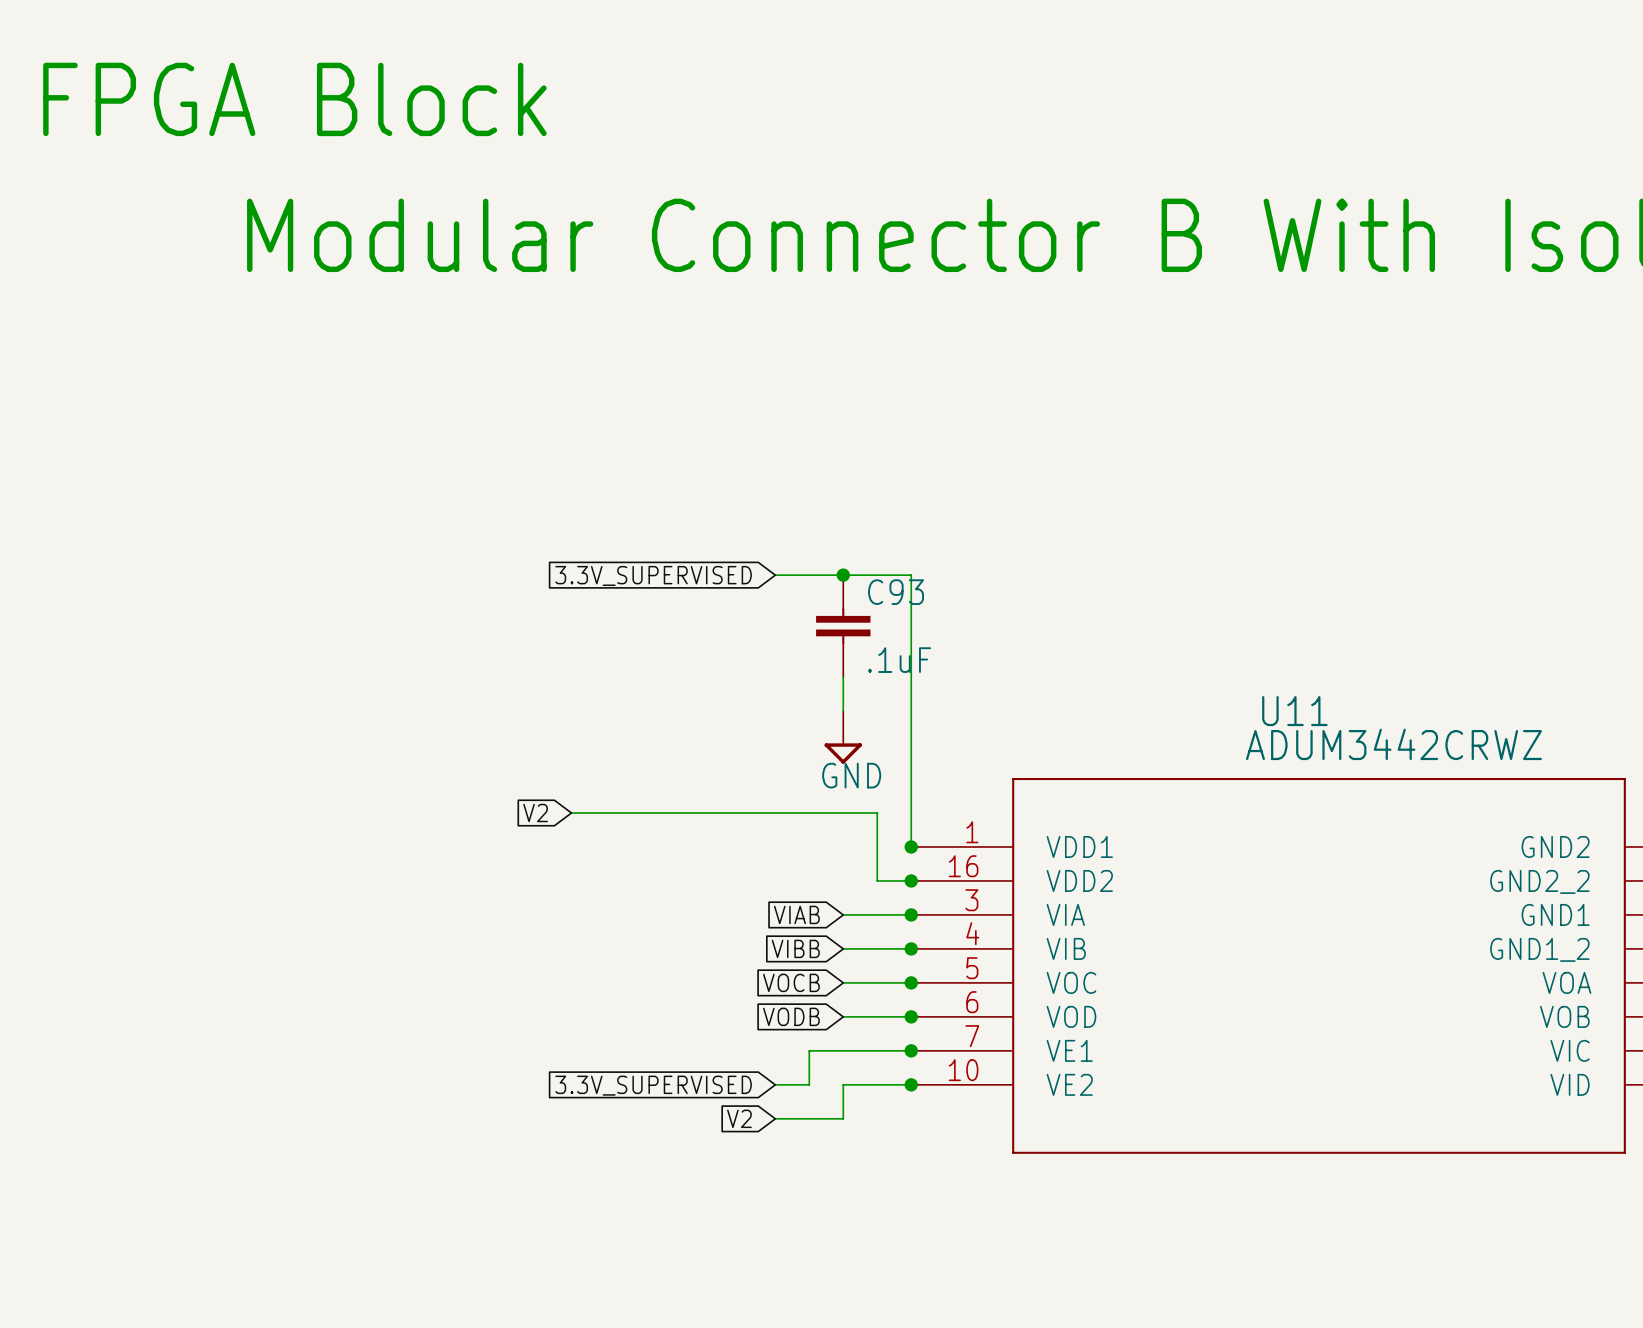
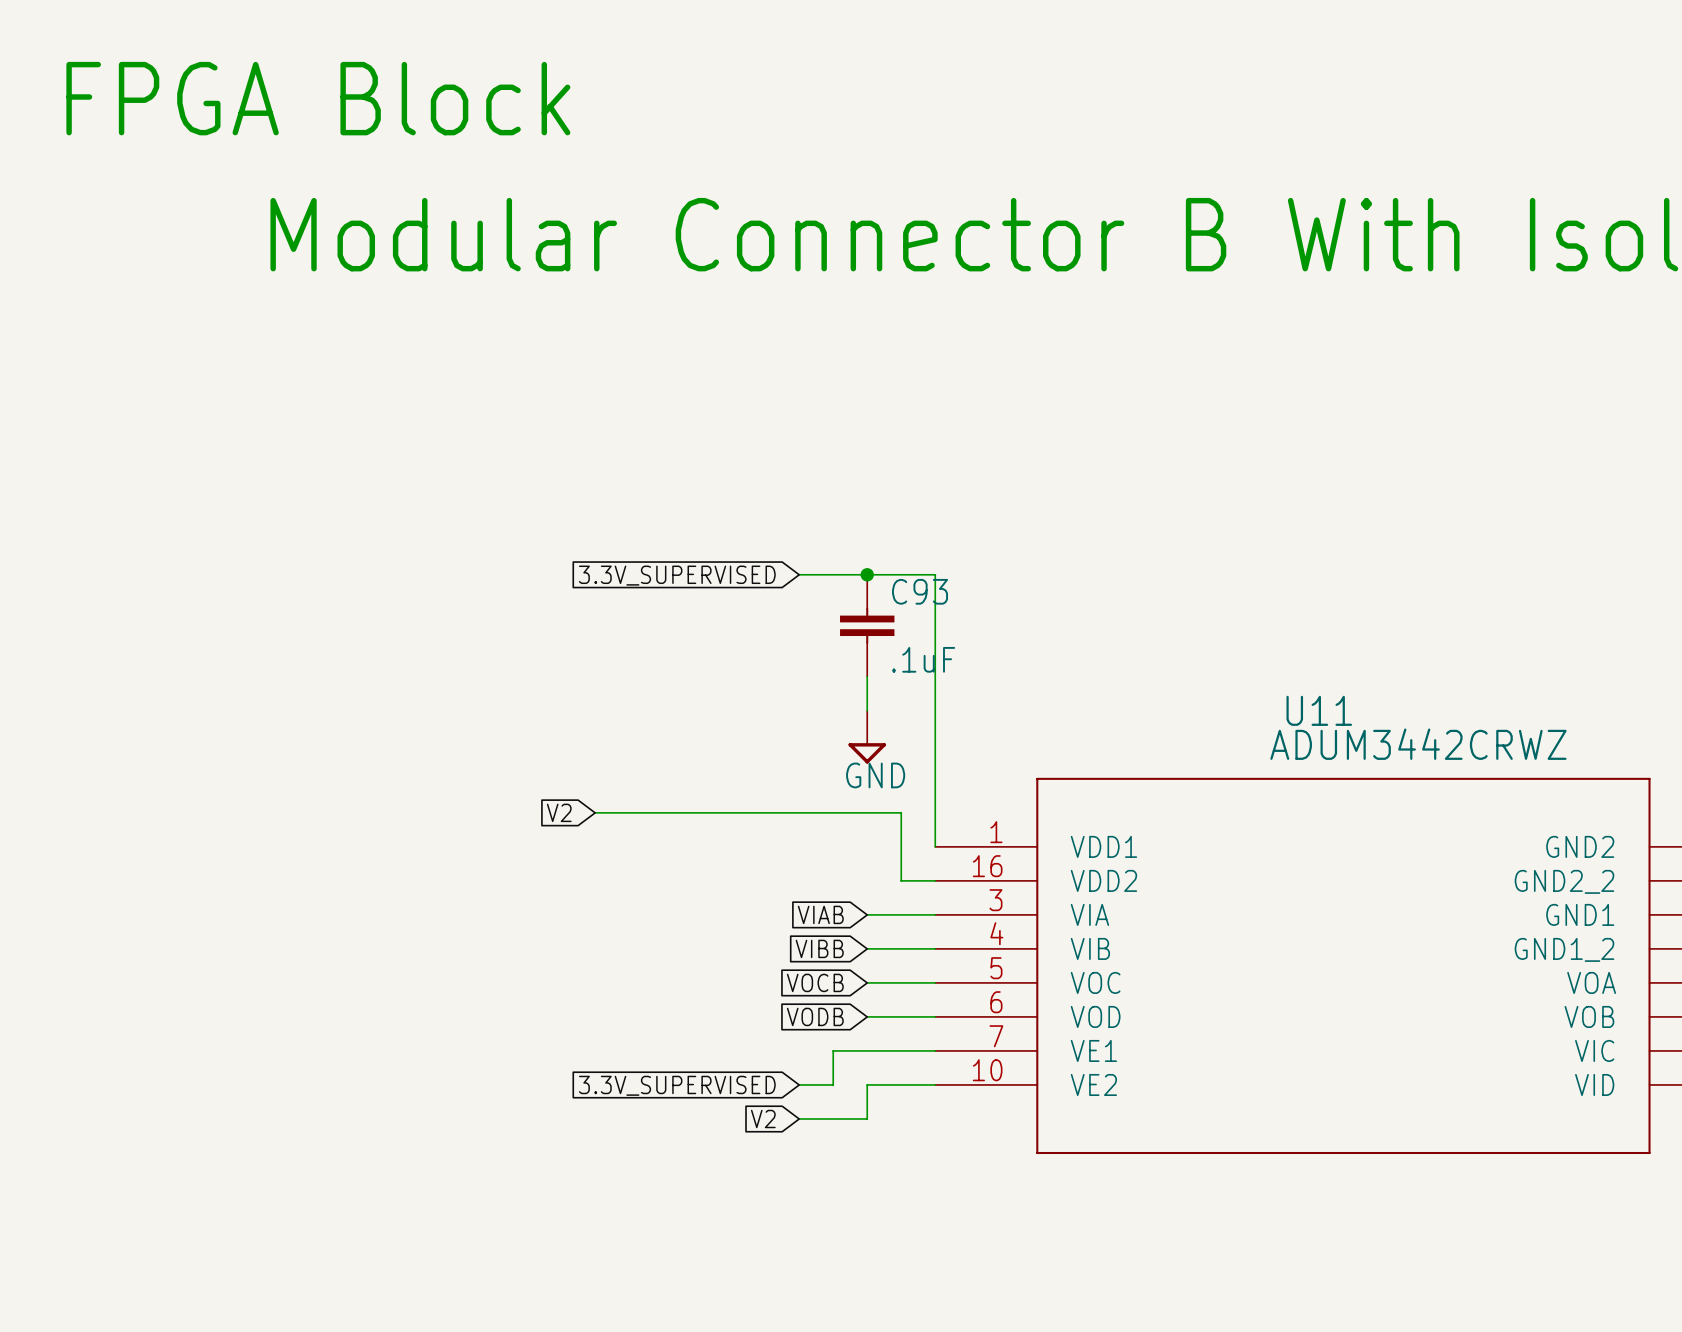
junction: (911, 846) -> none
junction: (911, 880) -> none
junction: (911, 914) -> none
junction: (911, 948) -> none
junction: (911, 982) -> none
junction: (911, 1016) -> none
junction: (911, 1050) -> none
junction: (911, 1084) -> none

